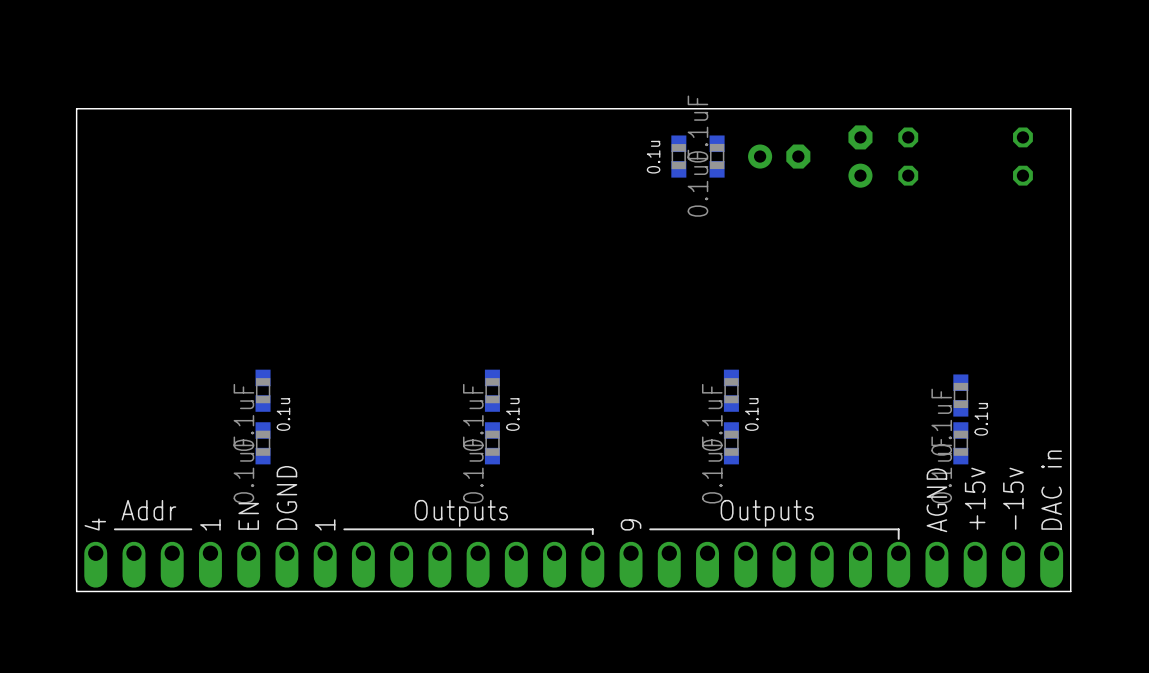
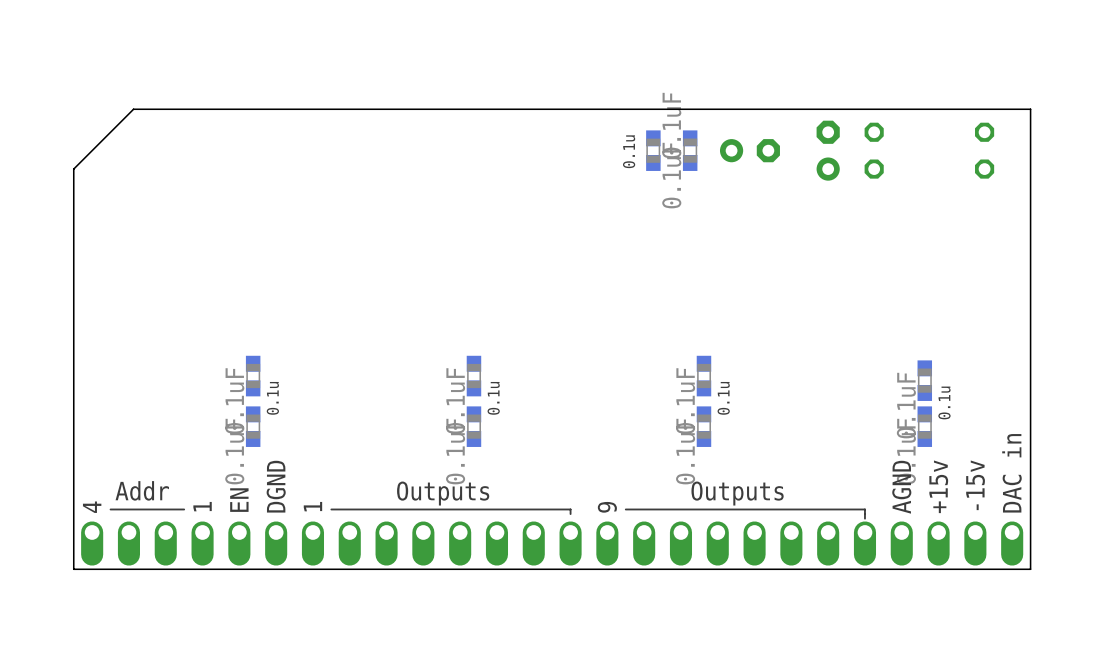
board edge: (1070, 113) (1070, 108) (76, 108) (76, 175) -> (1030, 109) (133, 109) (73, 169)

